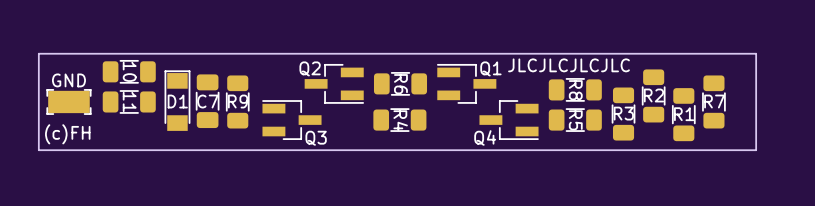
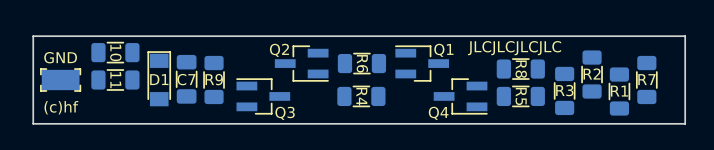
GND text: none -> GND (60, 57)
GND name: GND (68, 80) -> none
text: (c)FH (67, 134) -> (c)hf (61, 107)

